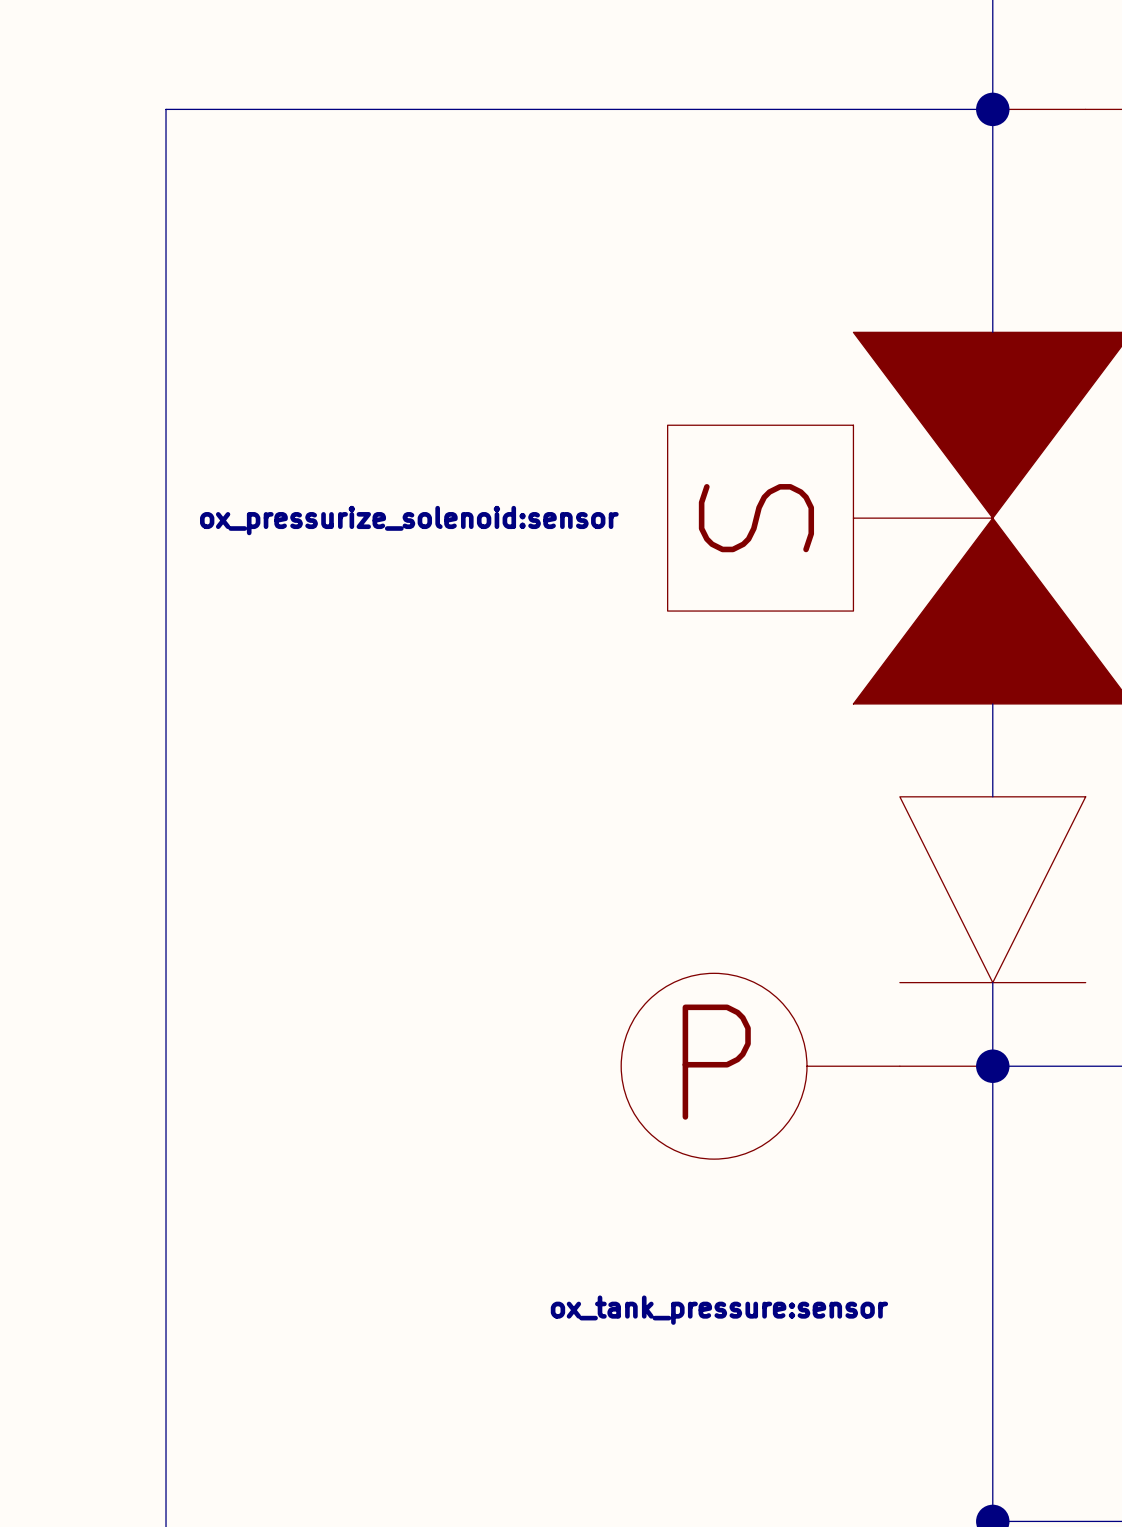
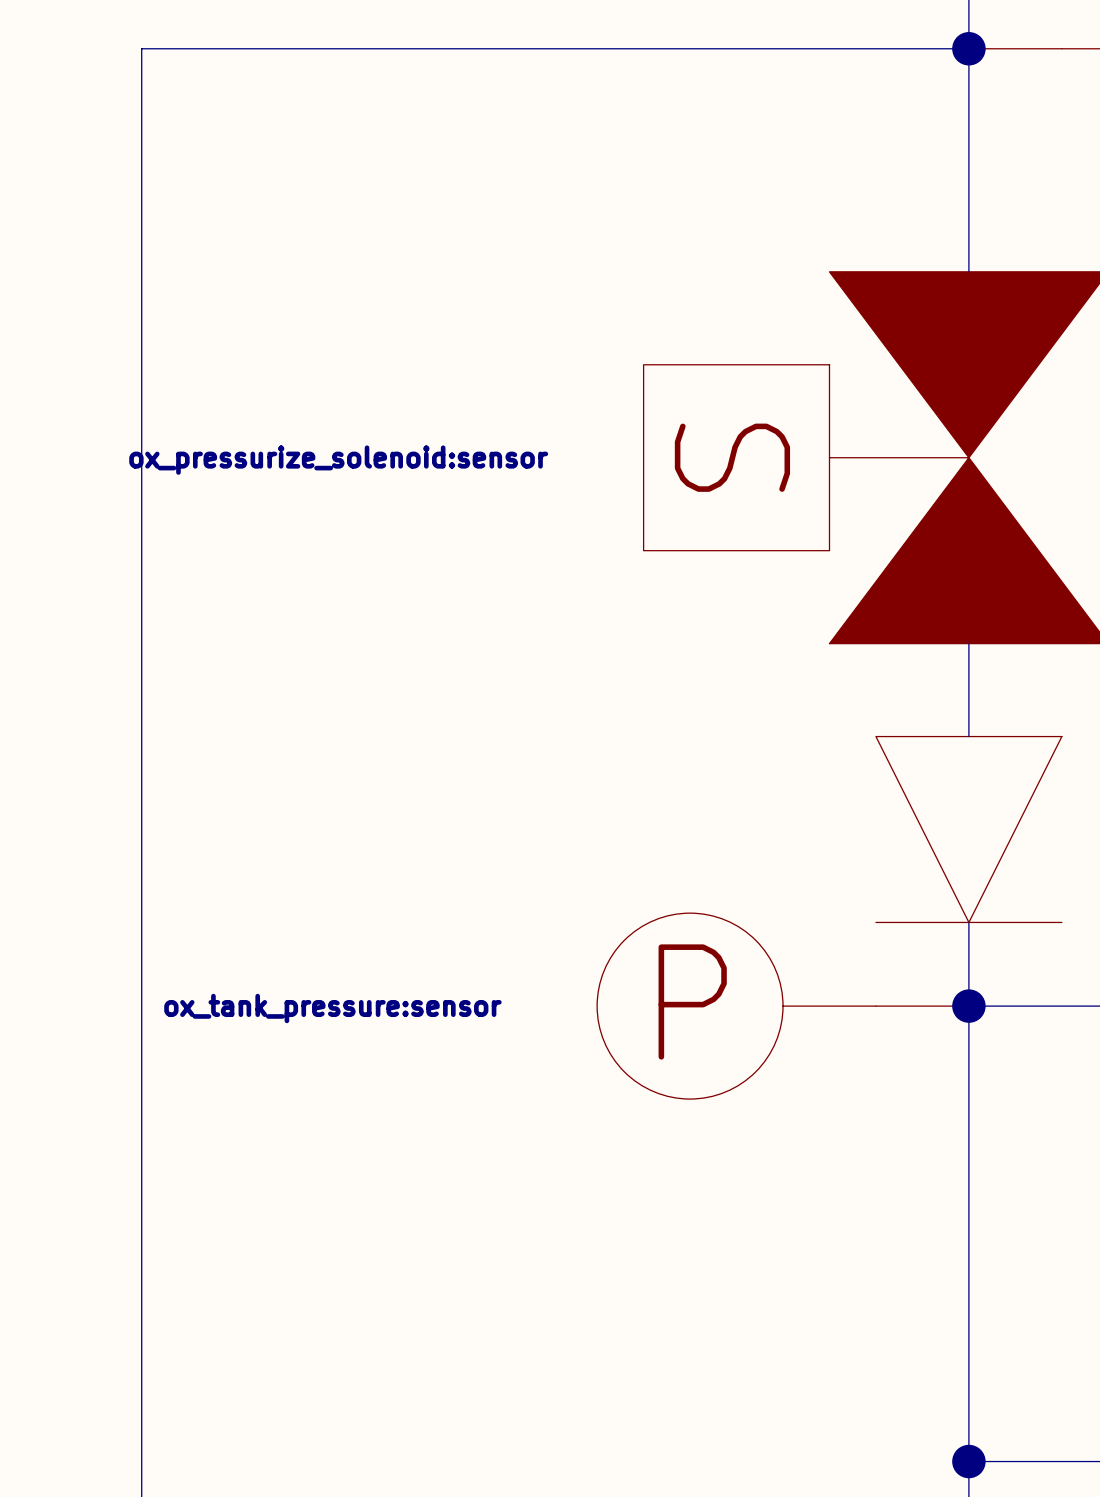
part value position: ox_pressurize_solenoid:sensor (409, 520) -> ox_pressurize_solenoid:sensor (338, 460)
part value position: ox_tank_pressure:sensor (719, 1310) -> ox_tank_pressure:sensor (332, 1008)

